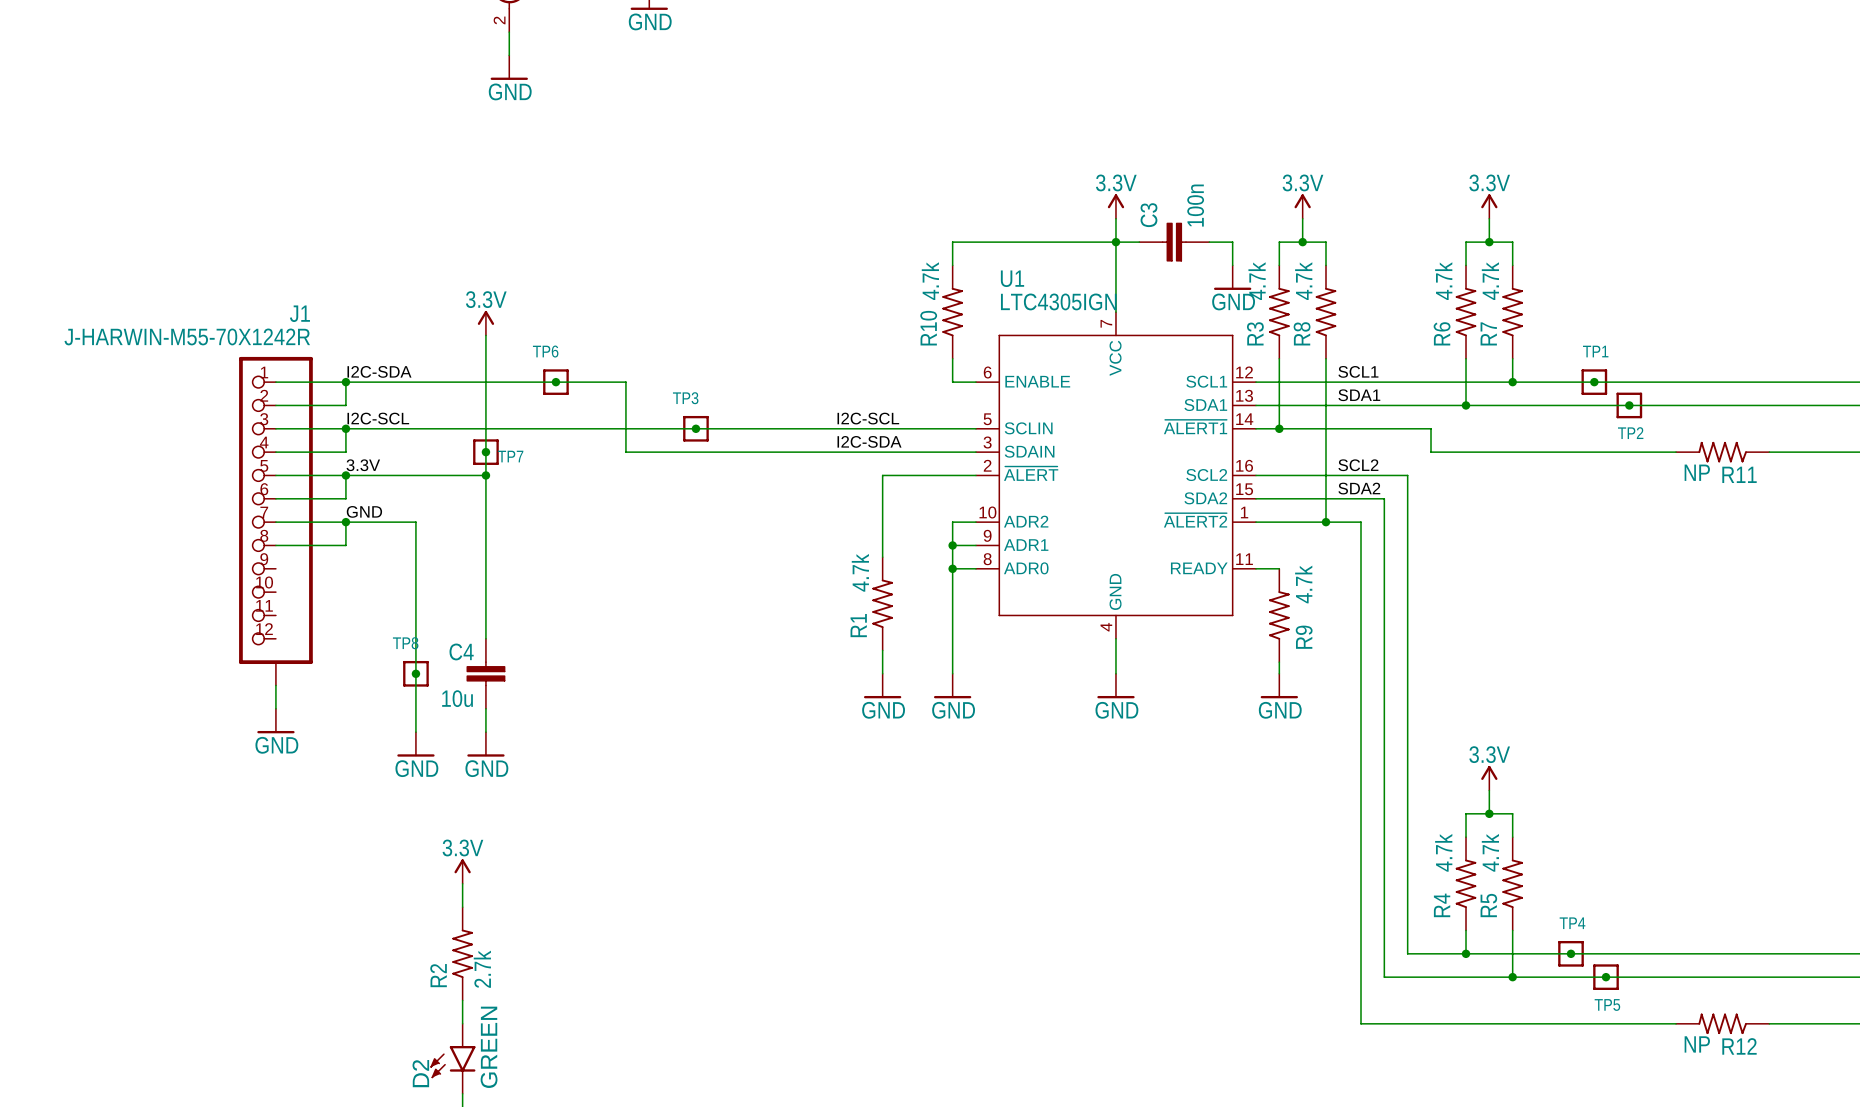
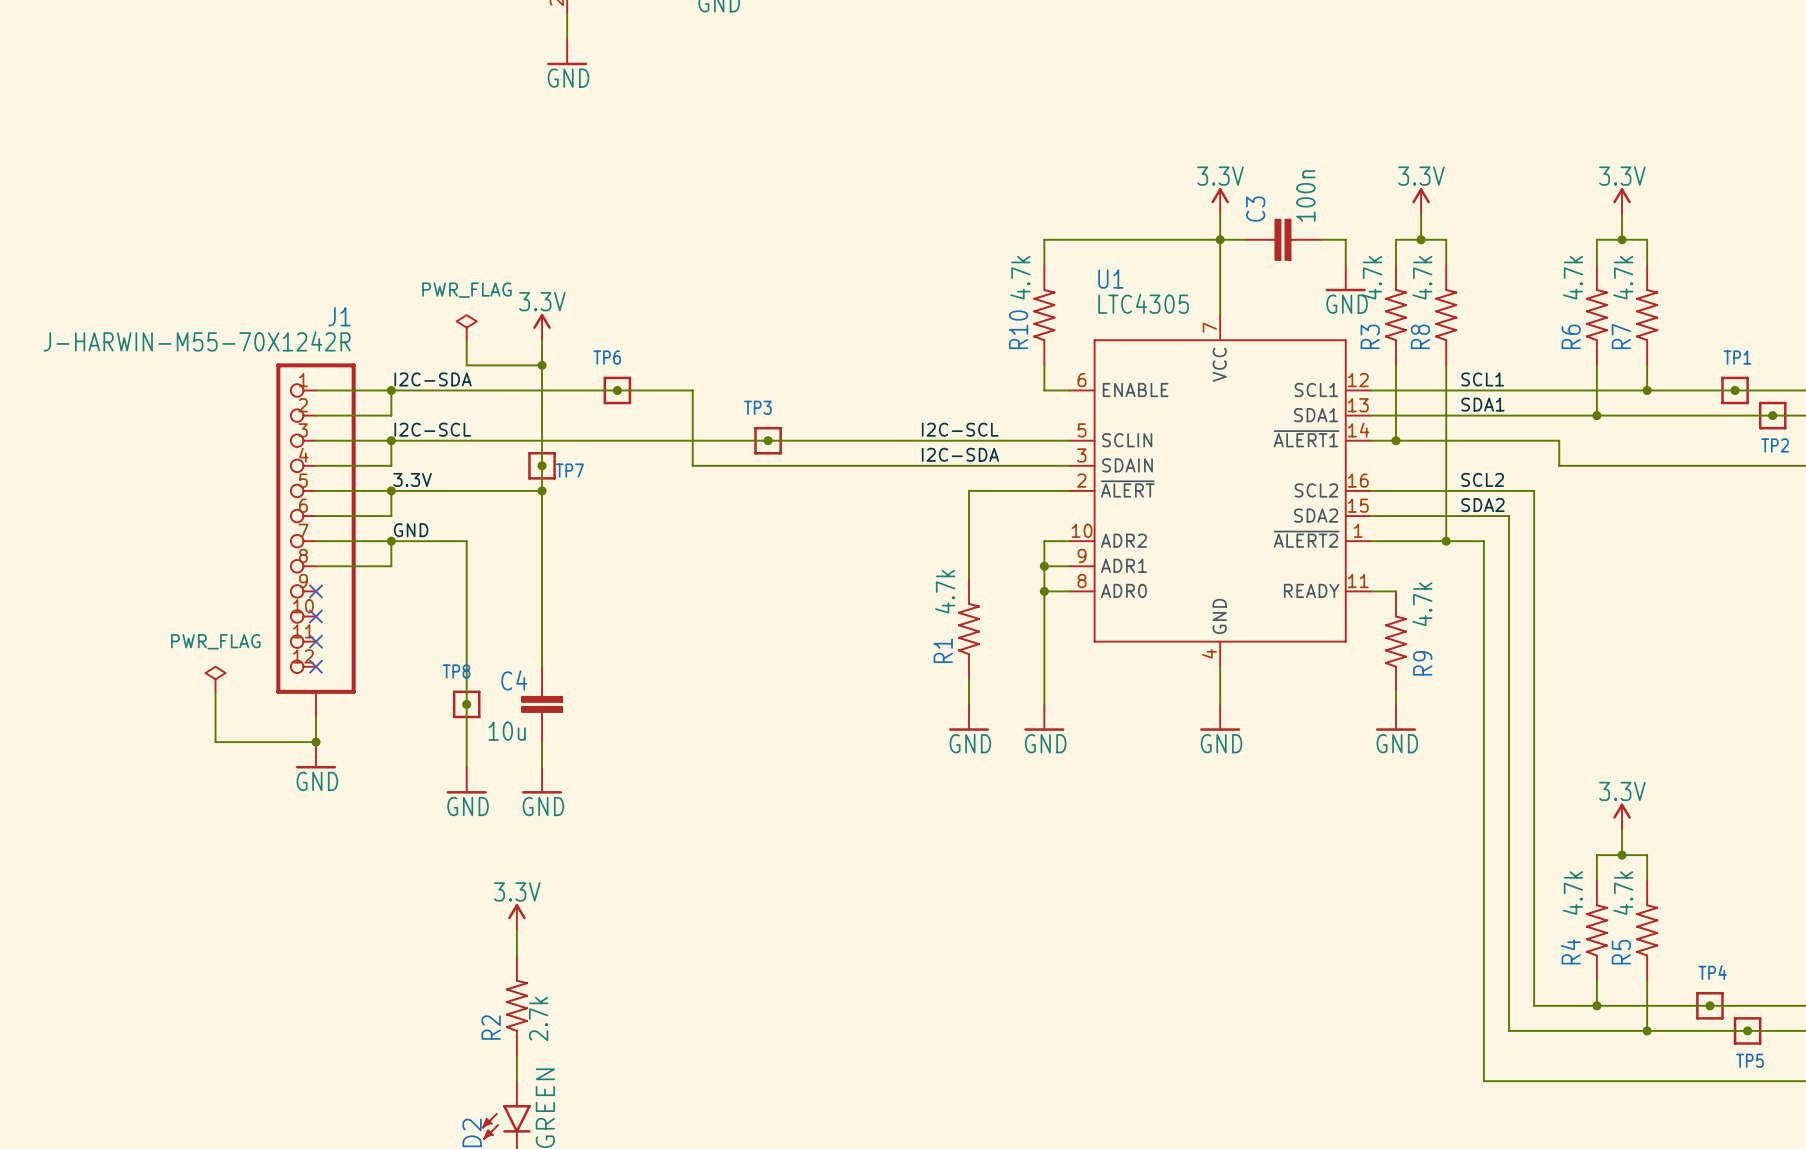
U1 value: LTC4305IGN (1058, 301) -> LTC4305 (1143, 303)
power symbol: none -> PWR_FLAG (466, 327)
wire: none -> (466, 340) (466, 365) (542, 365)
junction: none -> (542, 365)
no-connect mark: none -> (316, 591)
no-connect mark: none -> (316, 616)
no-connect mark: none -> (316, 641)
no-connect mark: none -> (316, 666)
power symbol: none -> PWR_FLAG (215, 679)
wire: none -> (215, 691) (215, 742) (316, 742)
junction: none -> (316, 742)

